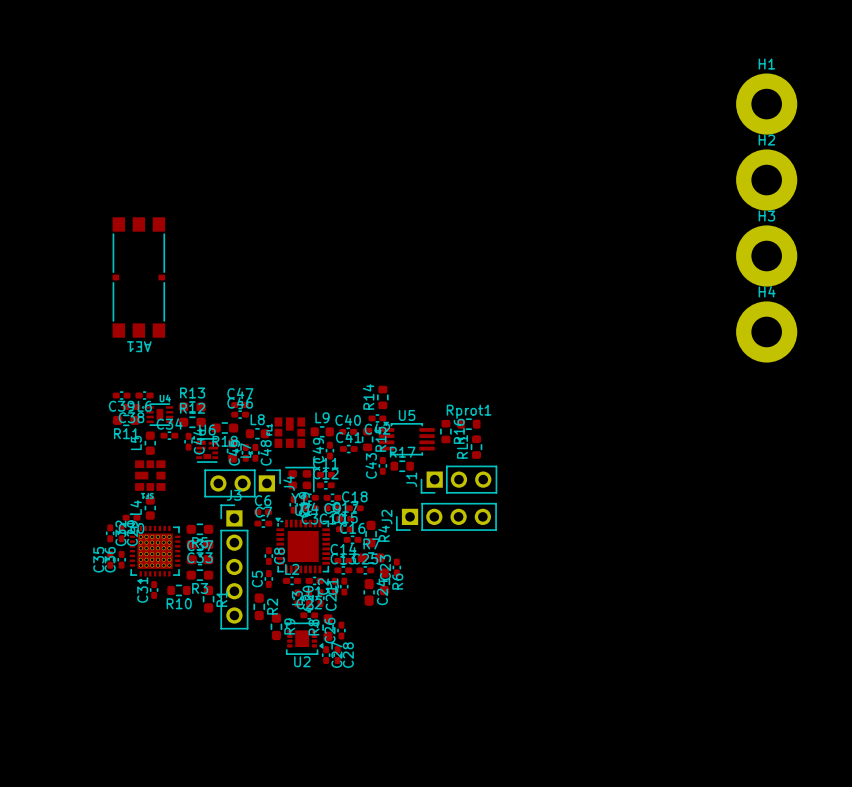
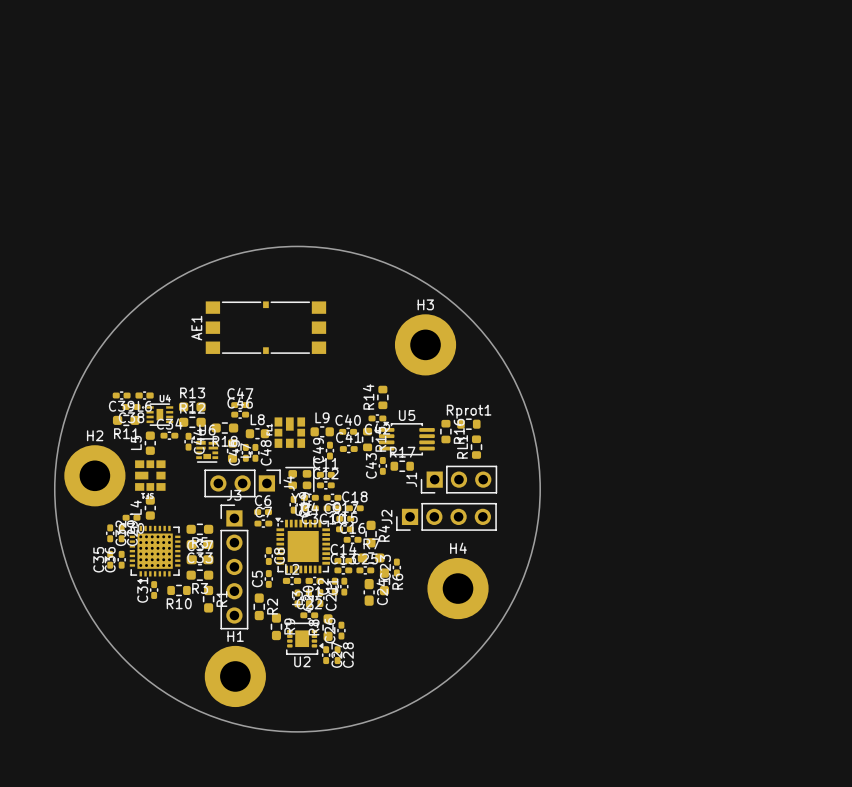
H1 position: (766, 104) -> (235, 676)
H2 position: (766, 180) -> (94, 475)
round board edge: none -> [54, 246, 541, 733]
H3 position: (766, 256) -> (425, 344)
AE1 rotation: 0° (138, 277) -> 90° clockwise (265, 327)
AE1 position: (138, 277) -> (265, 327)
H4 position: (766, 331) -> (458, 588)

